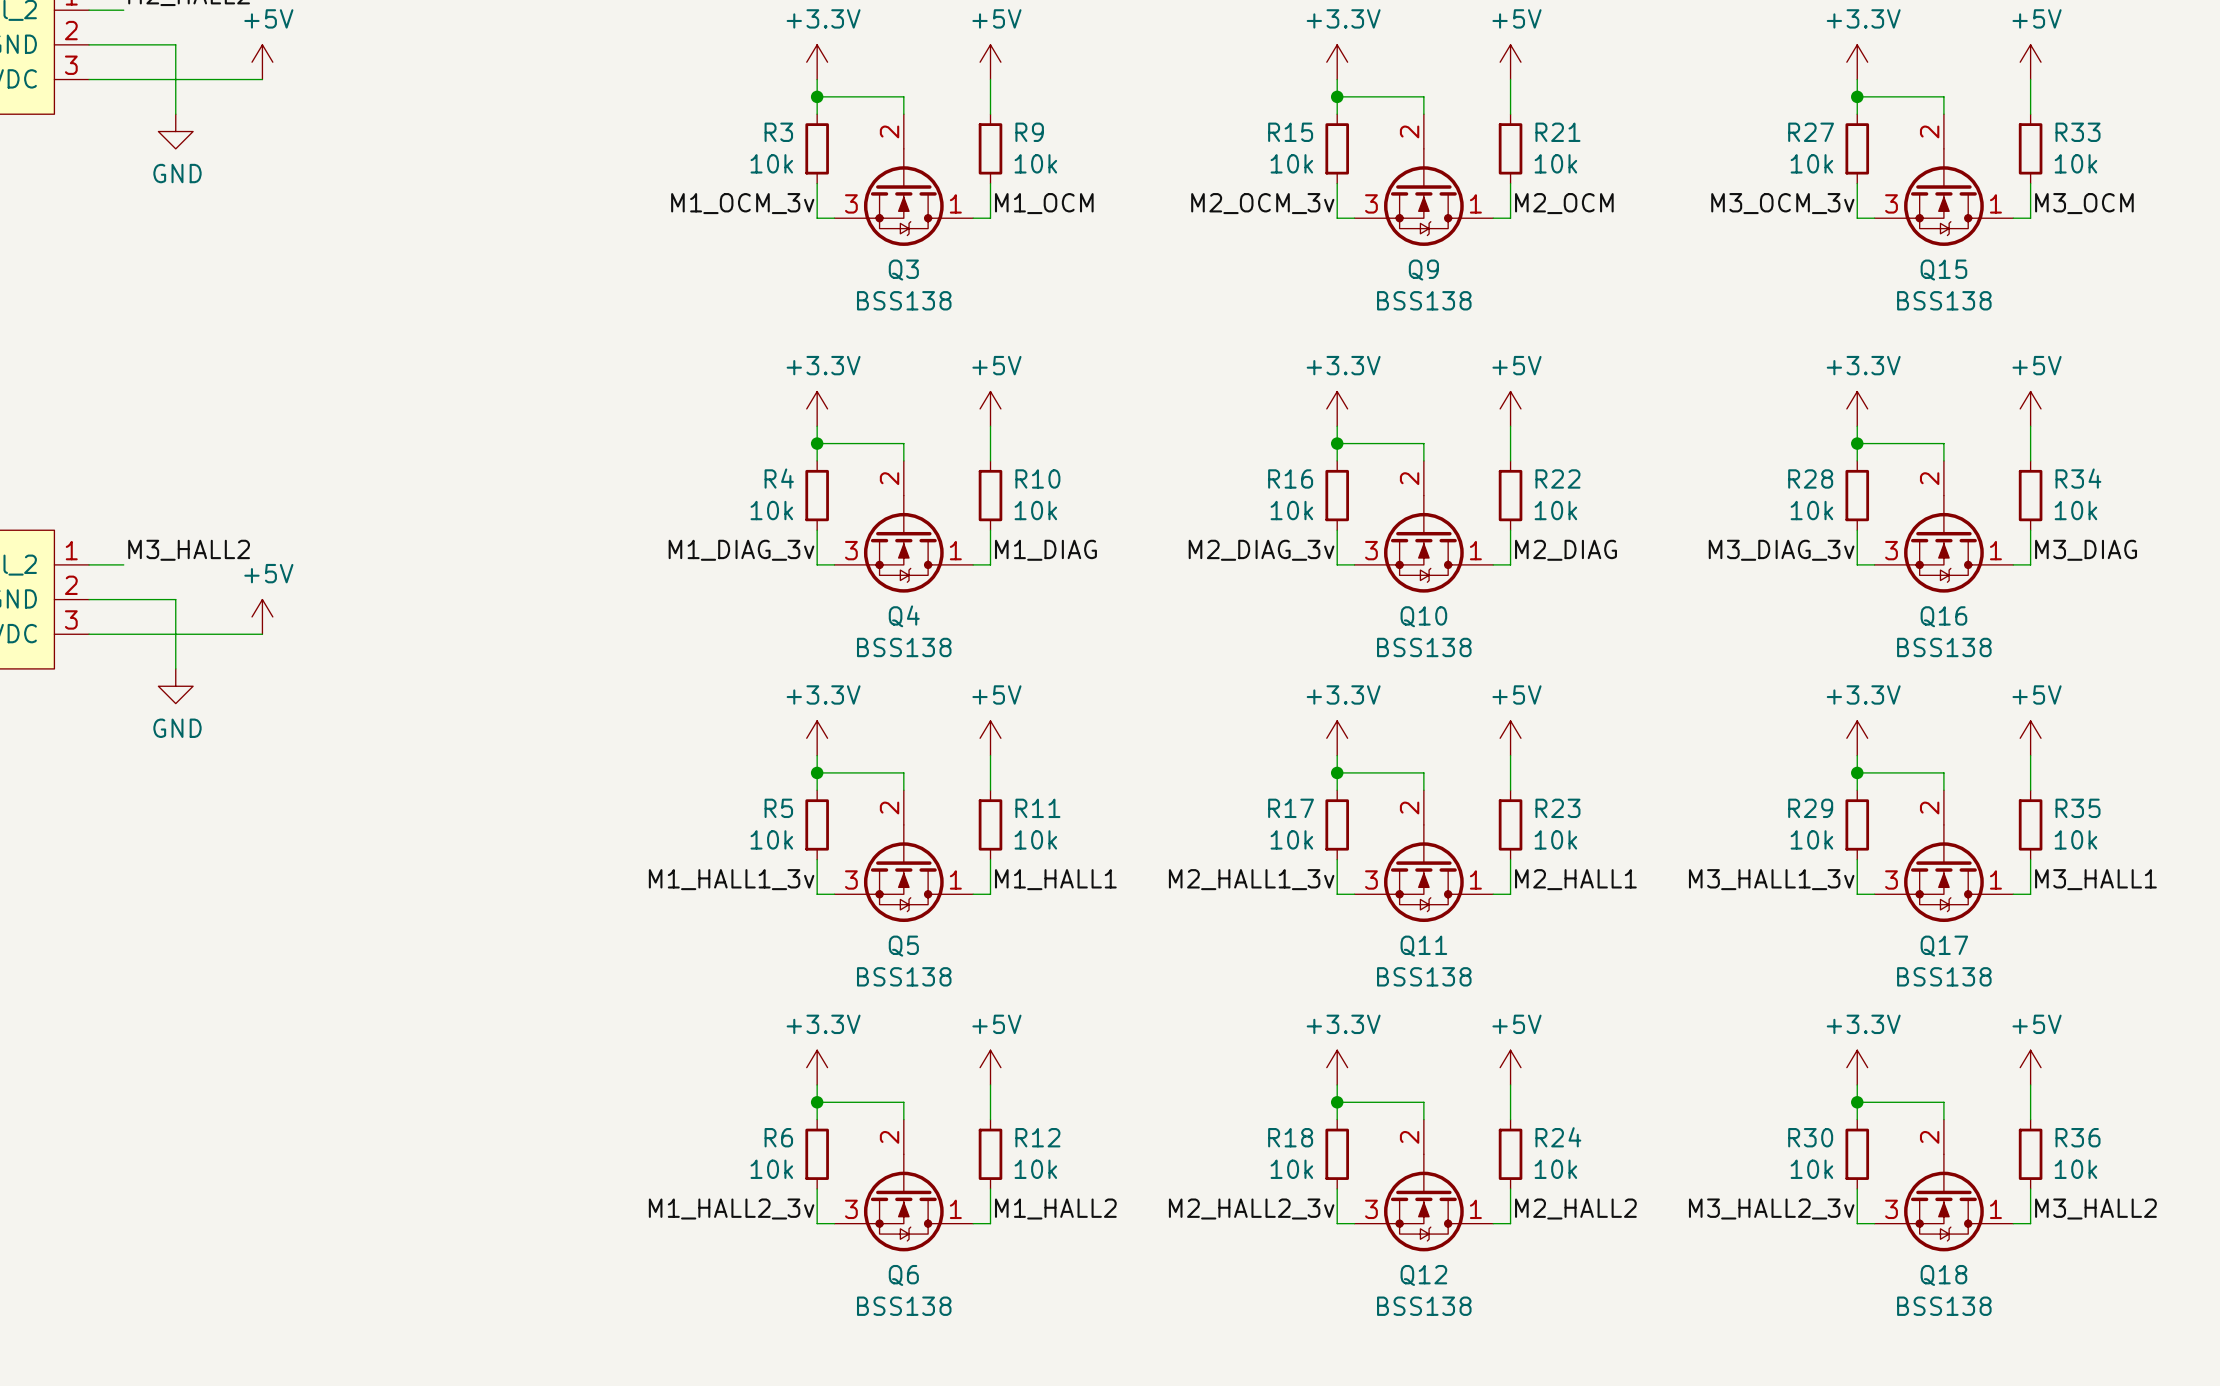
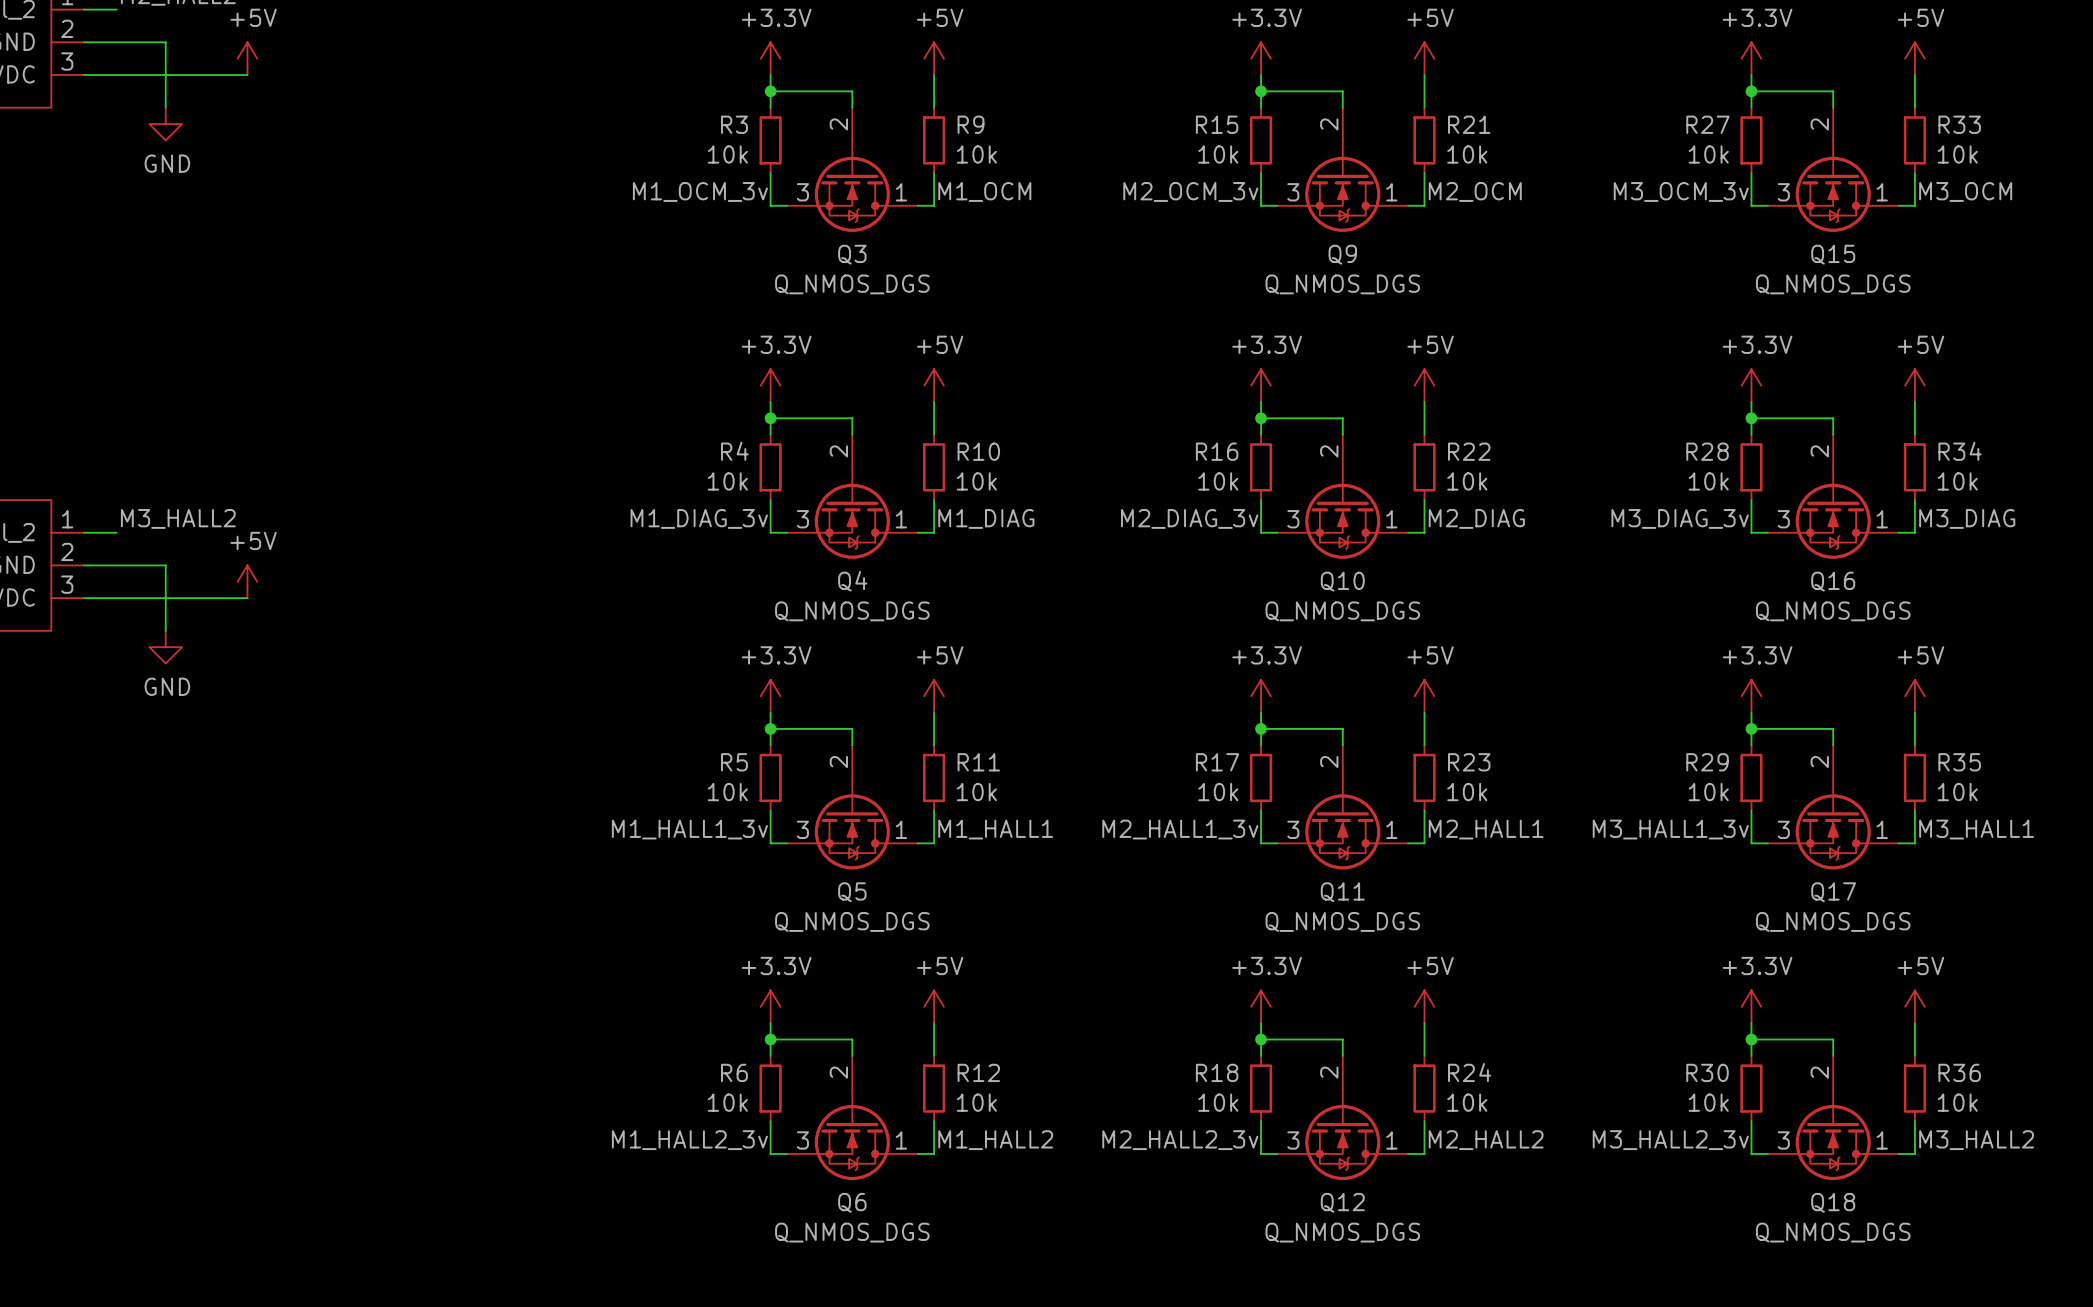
Q3 value: BSS138 (904, 300) -> Q_NMOS_DGS (852, 284)
Q9 value: BSS138 (1424, 300) -> Q_NMOS_DGS (1342, 284)
Q15 value: BSS138 (1944, 300) -> Q_NMOS_DGS (1833, 284)
Q4 value: BSS138 (904, 647) -> Q_NMOS_DGS (852, 611)
Q10 value: BSS138 (1424, 647) -> Q_NMOS_DGS (1342, 611)
Q16 value: BSS138 (1944, 647) -> Q_NMOS_DGS (1833, 611)
Q5 value: BSS138 (904, 976) -> Q_NMOS_DGS (852, 921)
Q11 value: BSS138 (1424, 976) -> Q_NMOS_DGS (1342, 921)
Q17 value: BSS138 (1944, 976) -> Q_NMOS_DGS (1833, 921)
Q6 value: BSS138 (904, 1306) -> Q_NMOS_DGS (852, 1232)
Q12 value: BSS138 (1424, 1306) -> Q_NMOS_DGS (1342, 1232)
Q18 value: BSS138 (1944, 1306) -> Q_NMOS_DGS (1833, 1232)

